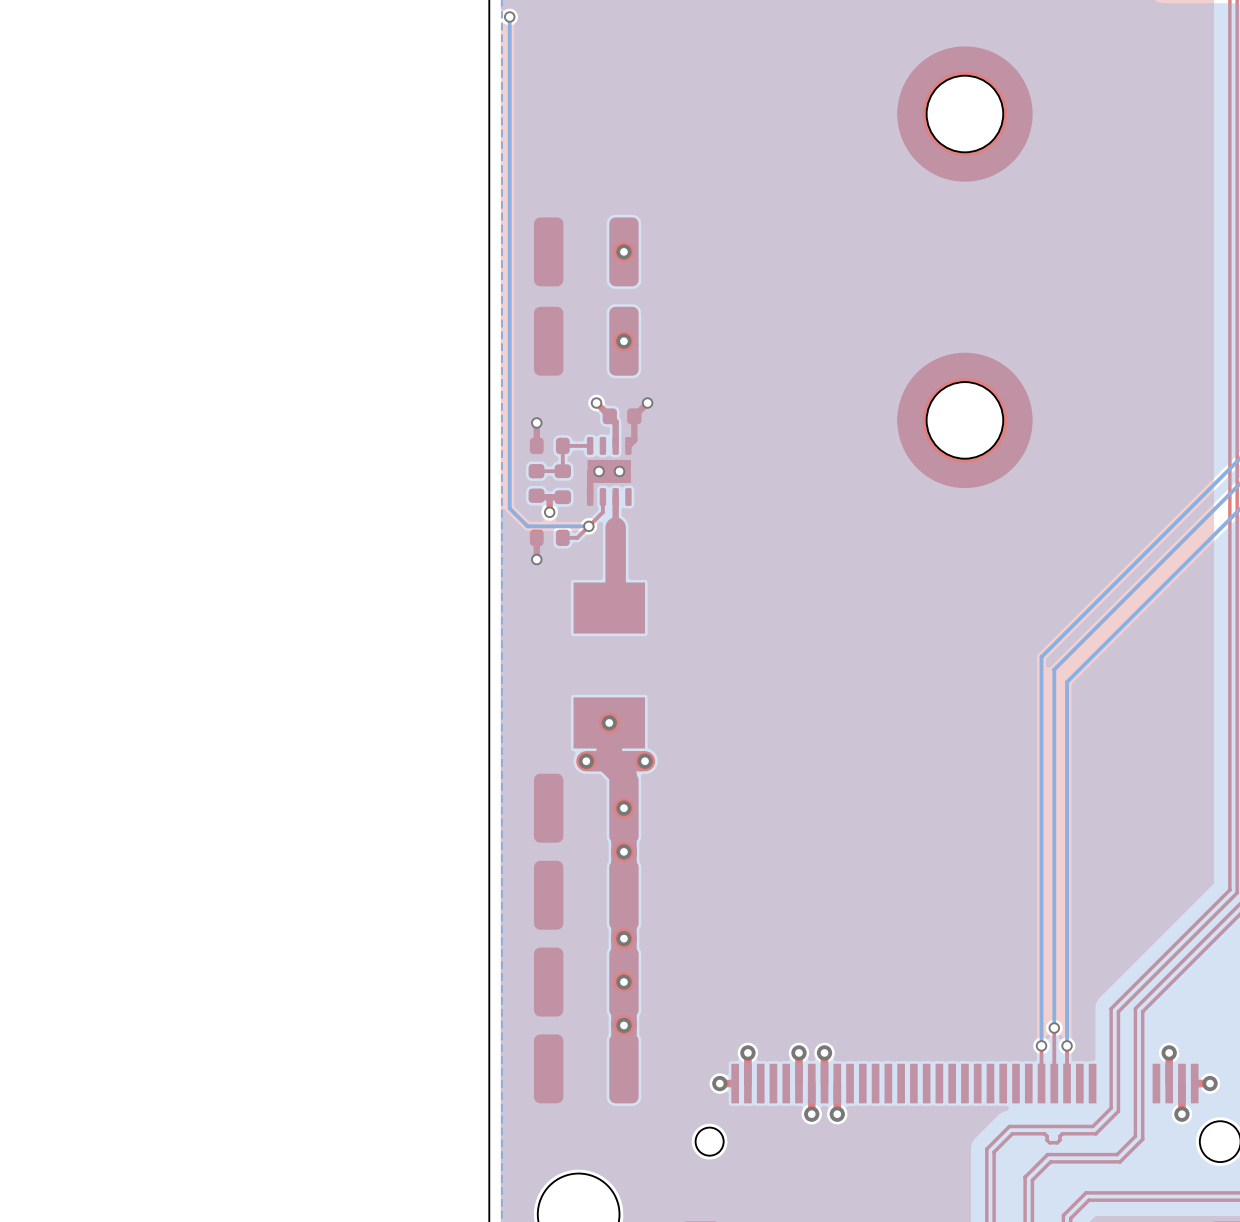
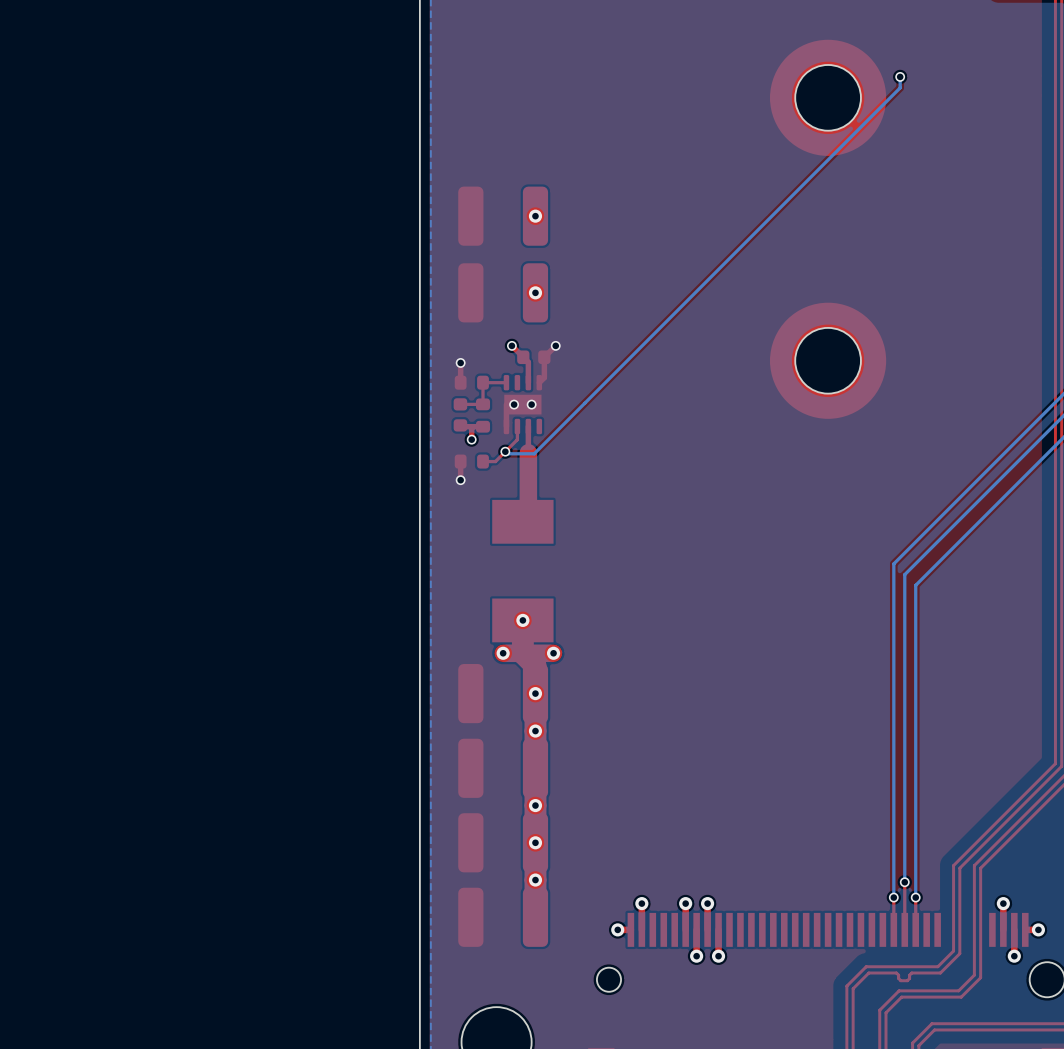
bottom track: (509, 17) (509, 508) (527, 526) (588, 526) -> none
via: (509, 17) -> none
bottom track: none -> (900, 76) (900, 87) (534, 453) (507, 453)
via: none -> (900, 76)

